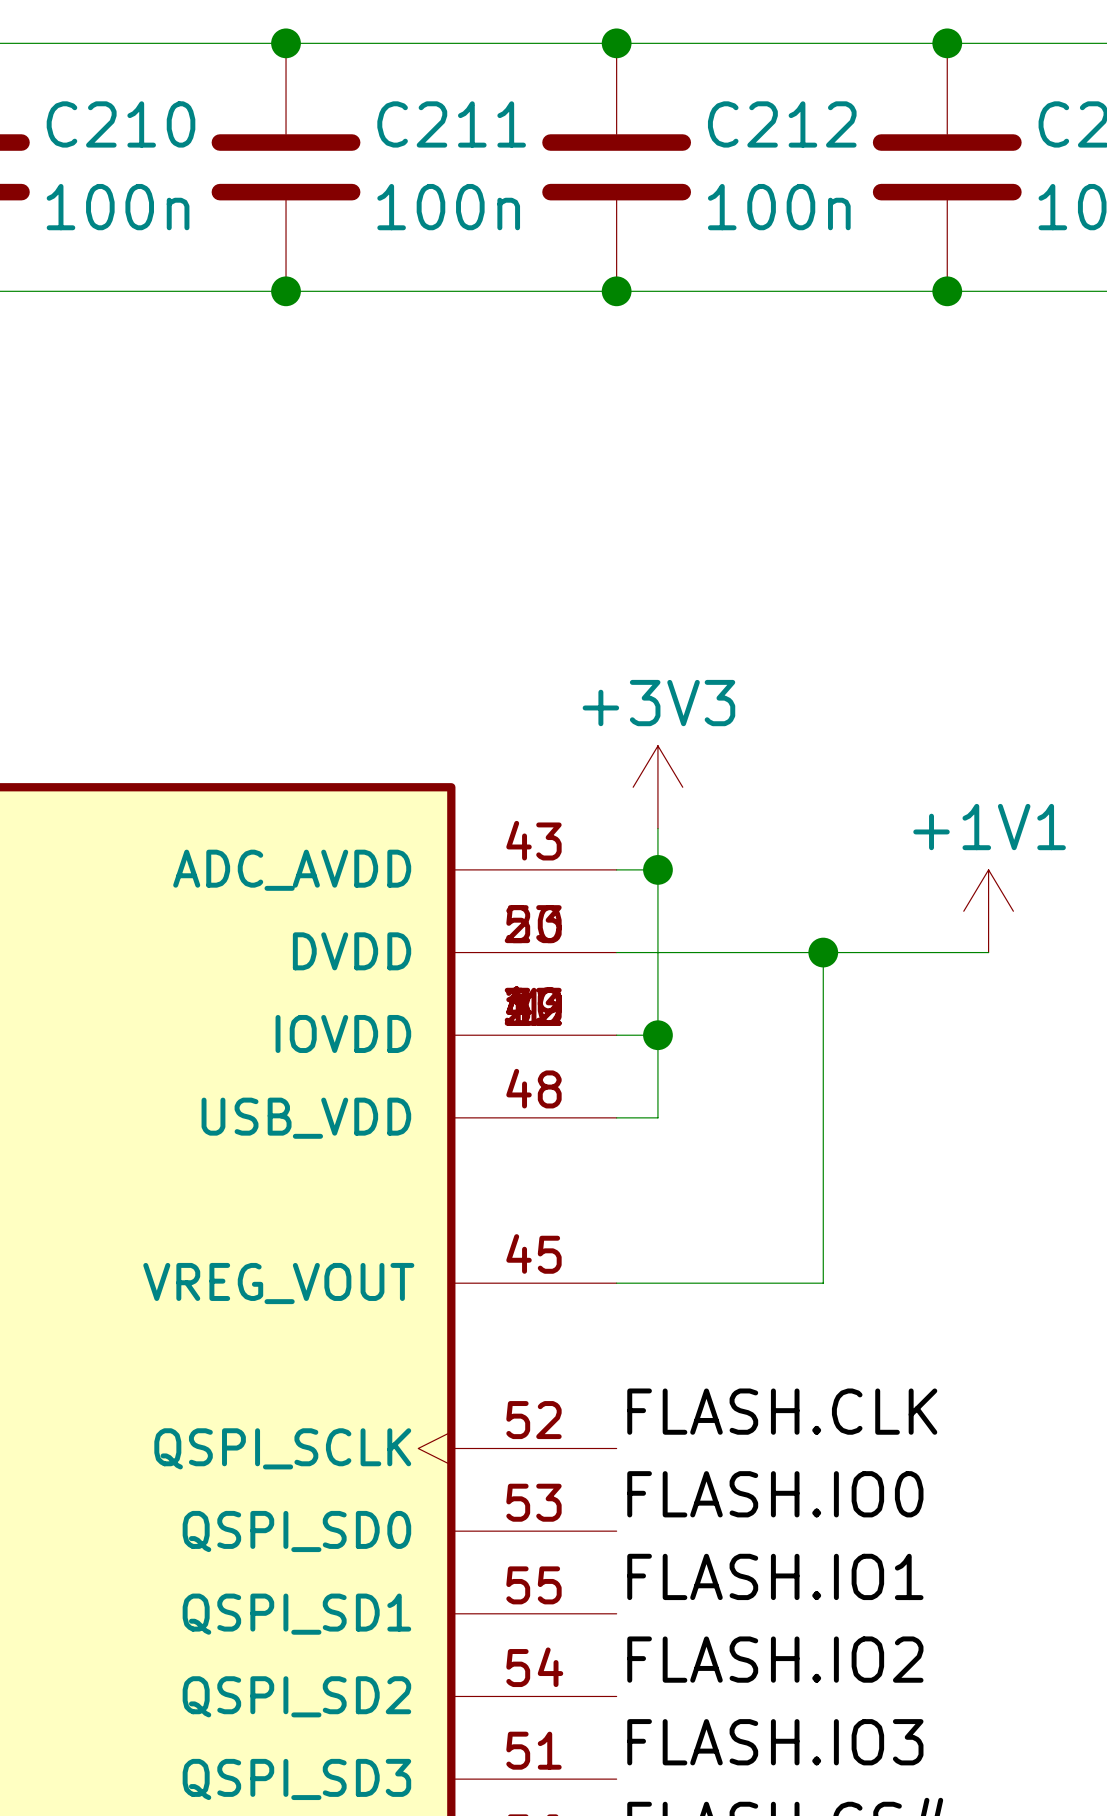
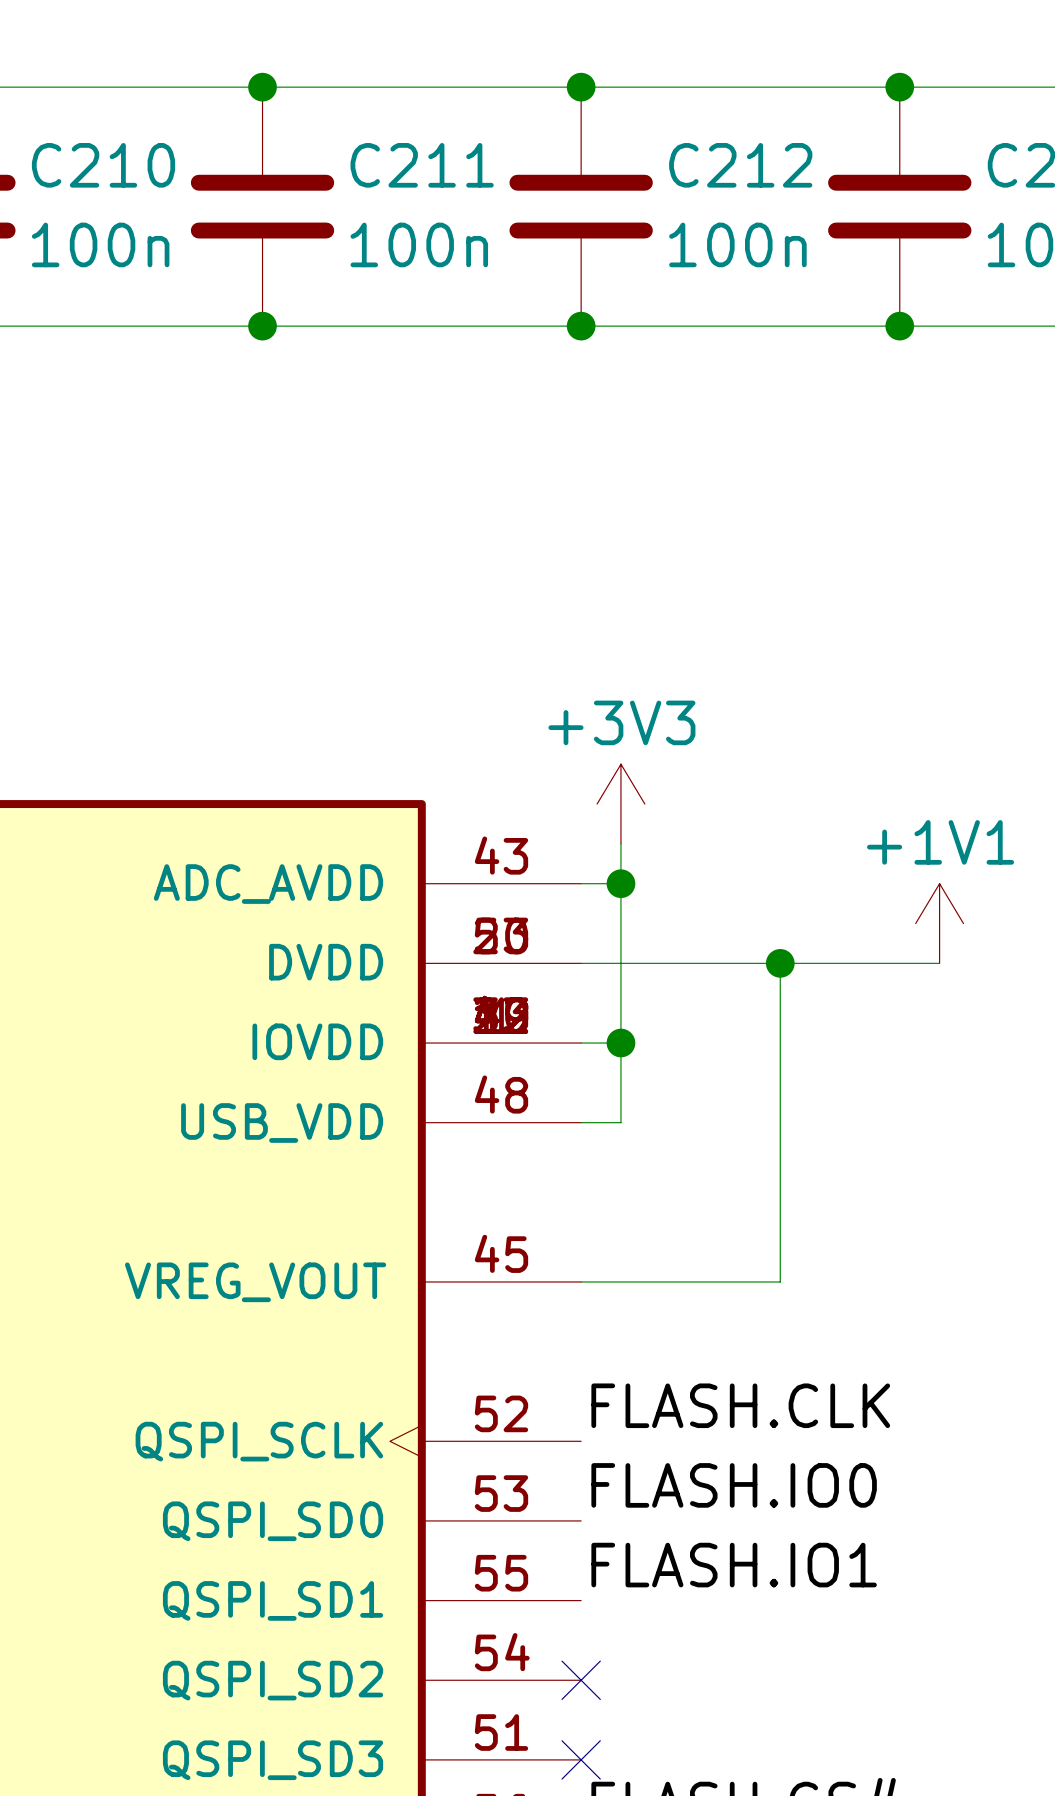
label: FLASH.IO2 (775, 1659) -> none
no-connect mark: none -> (581, 1680)
label: FLASH.IO3 (775, 1742) -> none
no-connect mark: none -> (581, 1759)

